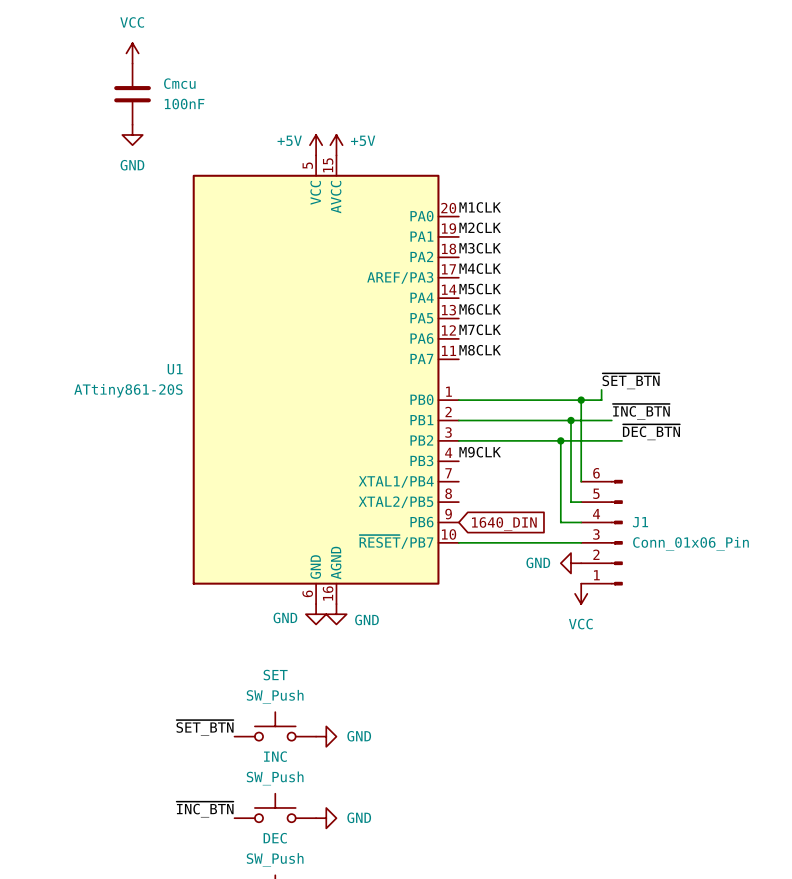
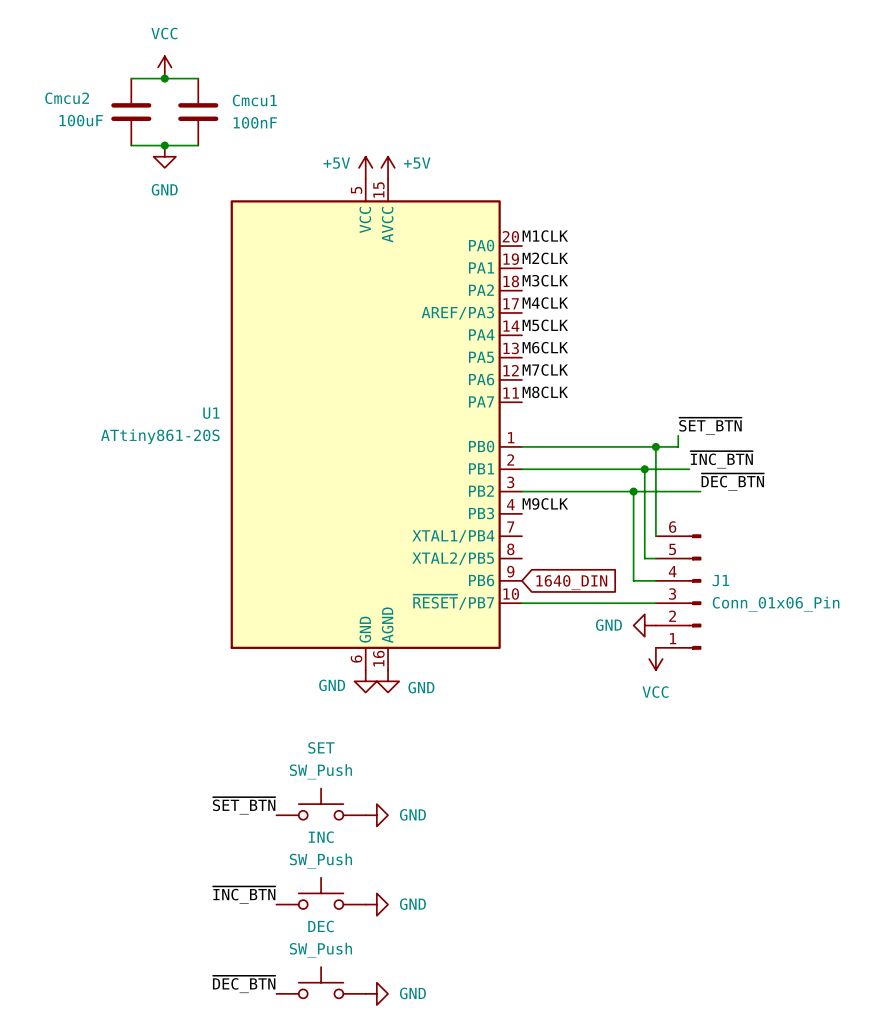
wire: none -> (131, 78) (198, 78)
junction: none -> (164, 78)
Cmcu2: none -> 100uF (131, 112)
Cmcu: 100nF (132, 94) -> none
Cmcu1: none -> 100nF (198, 112)
wire: none -> (131, 145) (198, 145)
junction: none -> (164, 145)

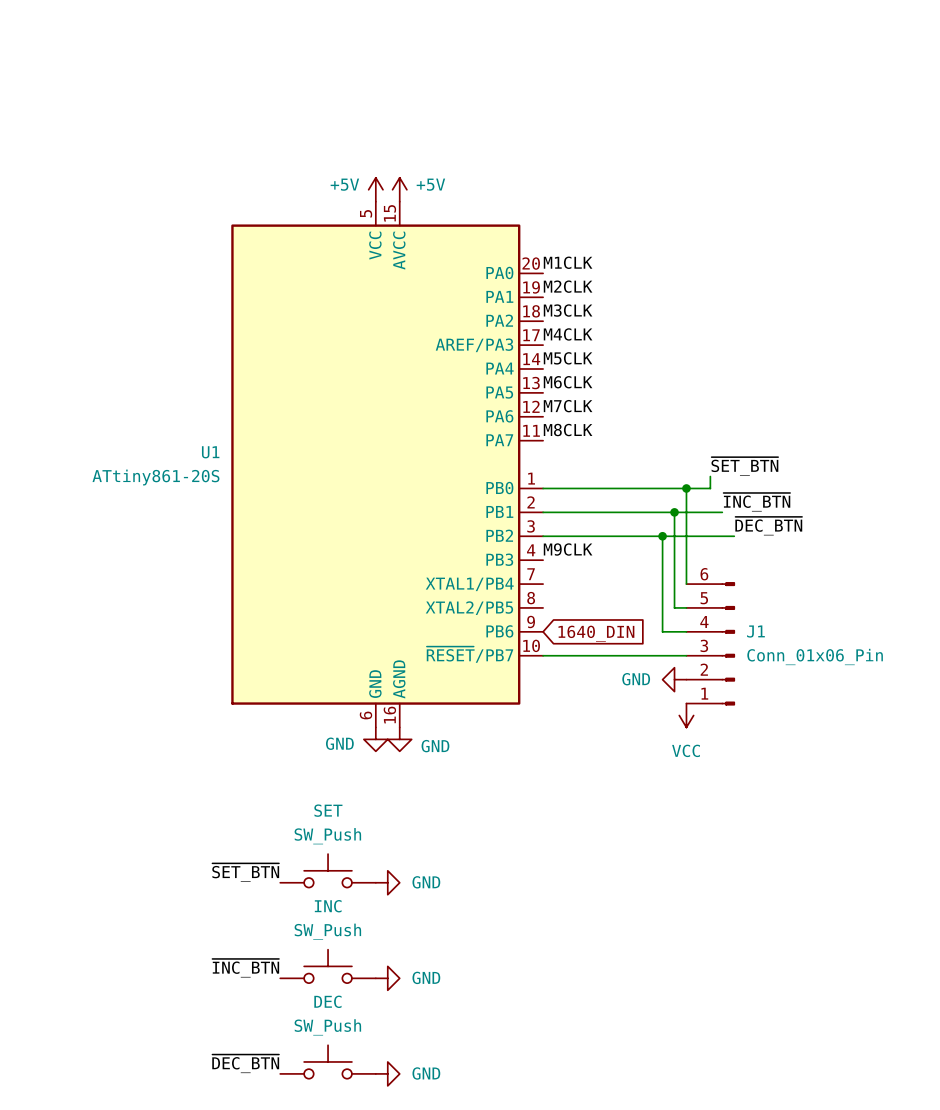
power symbol: VCC (164, 67) -> none
wire: (131, 78) (198, 78) -> none
junction: (164, 78) -> none
Cmcu2: 100uF (131, 112) -> none
Cmcu1: 100nF (198, 112) -> none
wire: (131, 145) (198, 145) -> none
junction: (164, 145) -> none
power symbol: GND (164, 156) -> none

